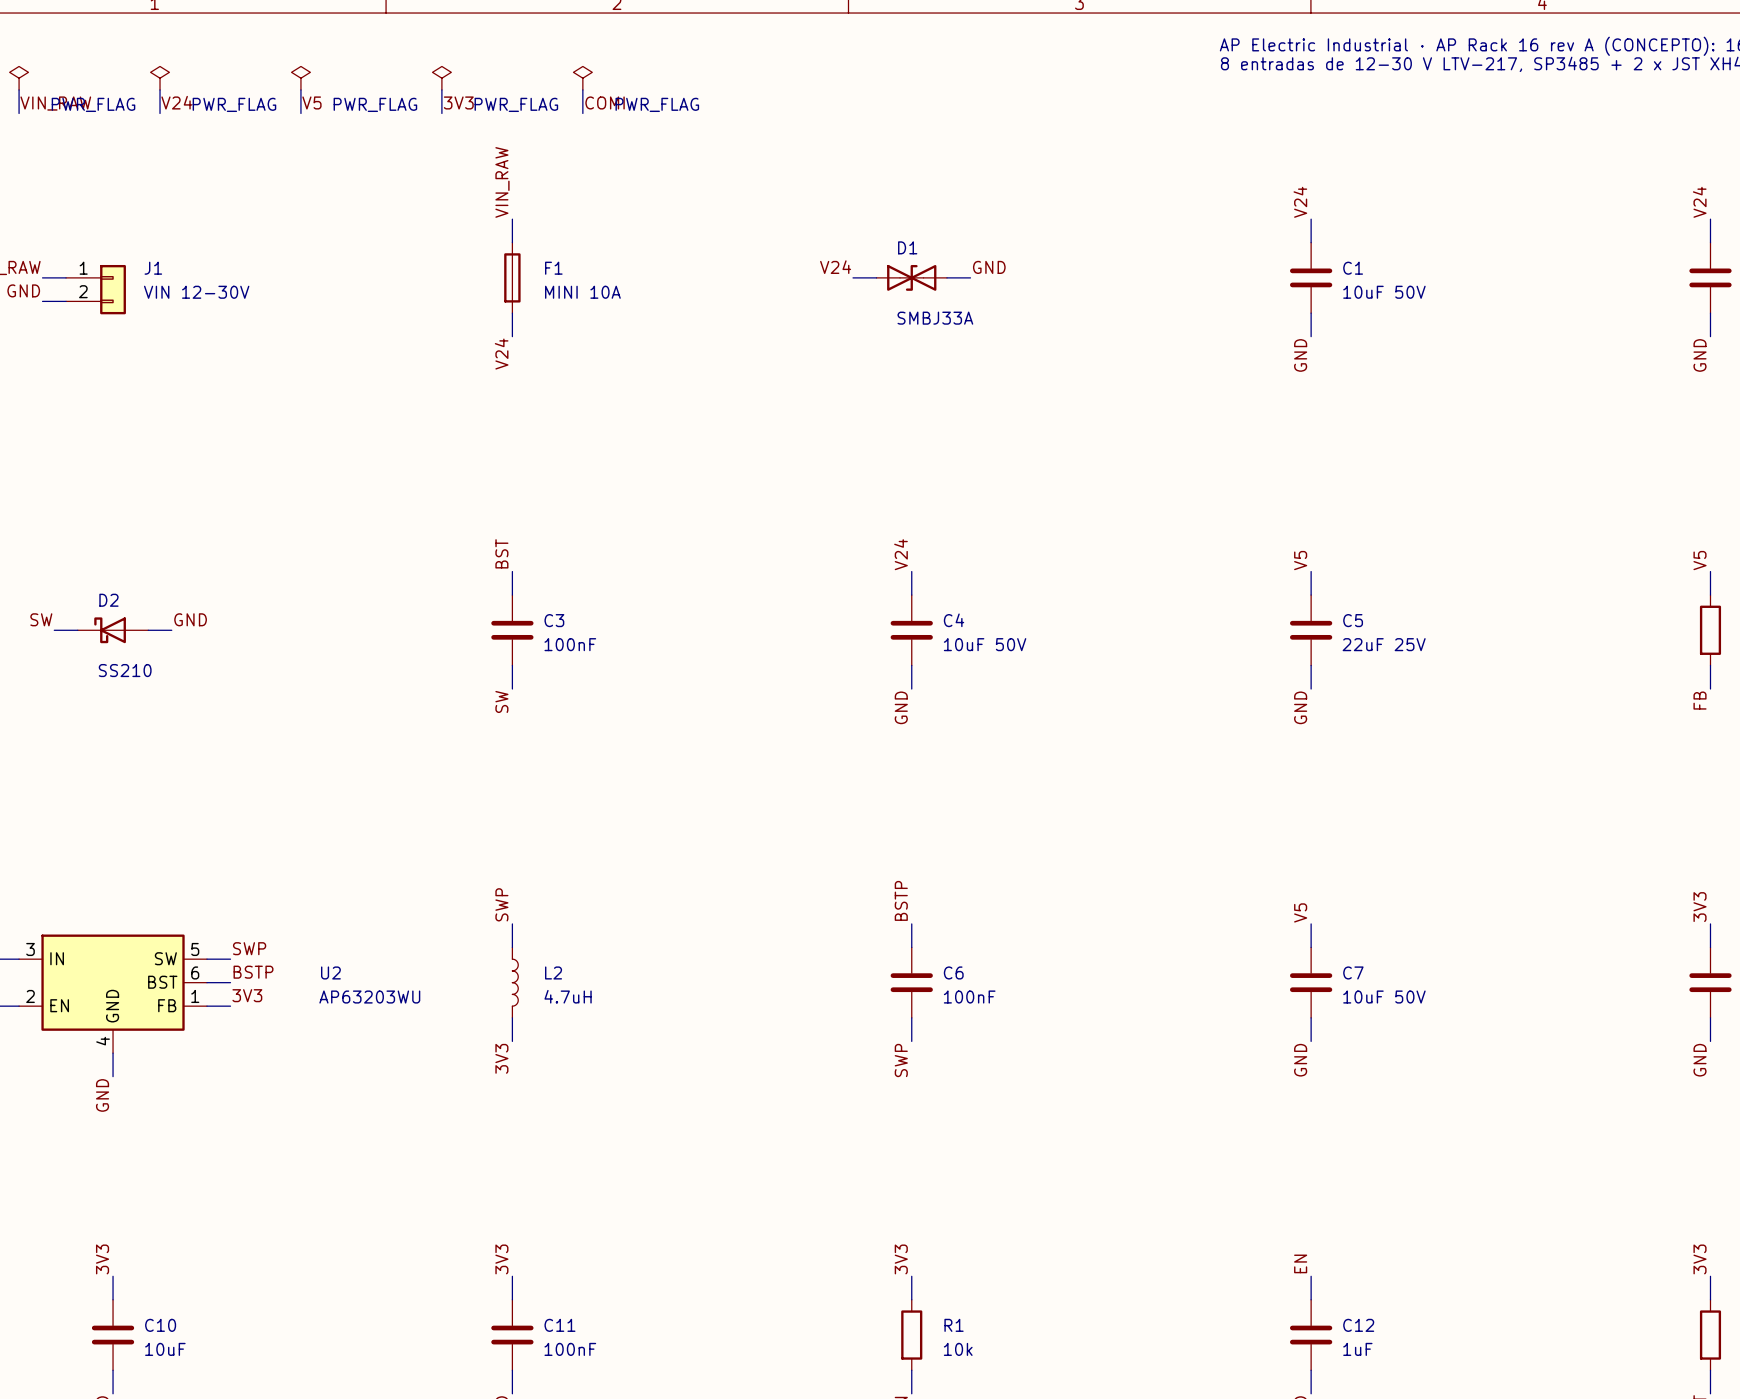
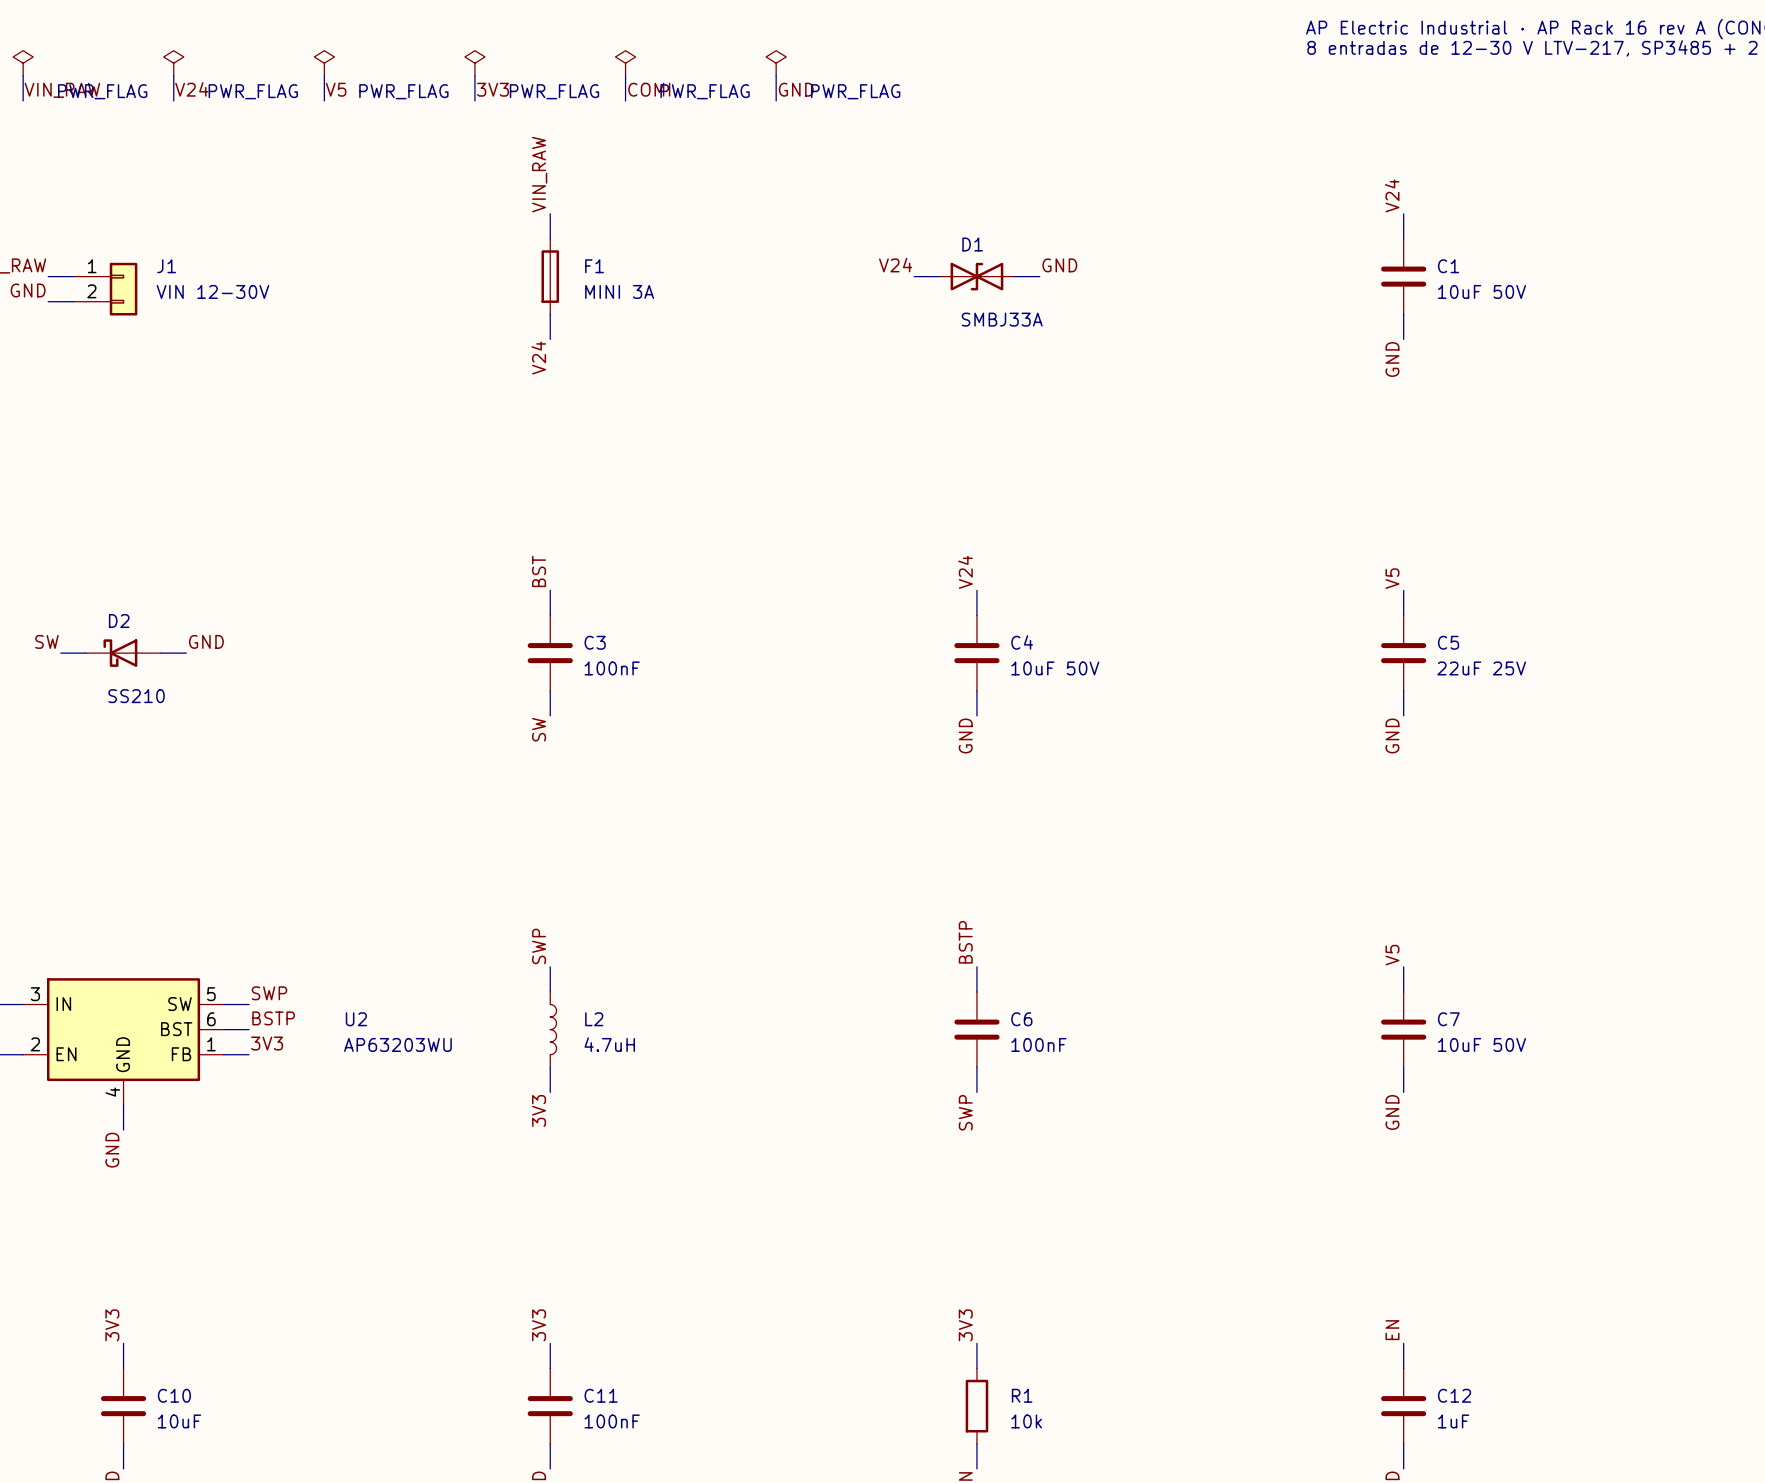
power symbol: none -> PWR_FLAG (776, 63)
wire: none -> (776, 75) (776, 100)
label: none -> GND (796, 89)
F1 value: MINI 10A (582, 292) -> MINI 3A (619, 291)

